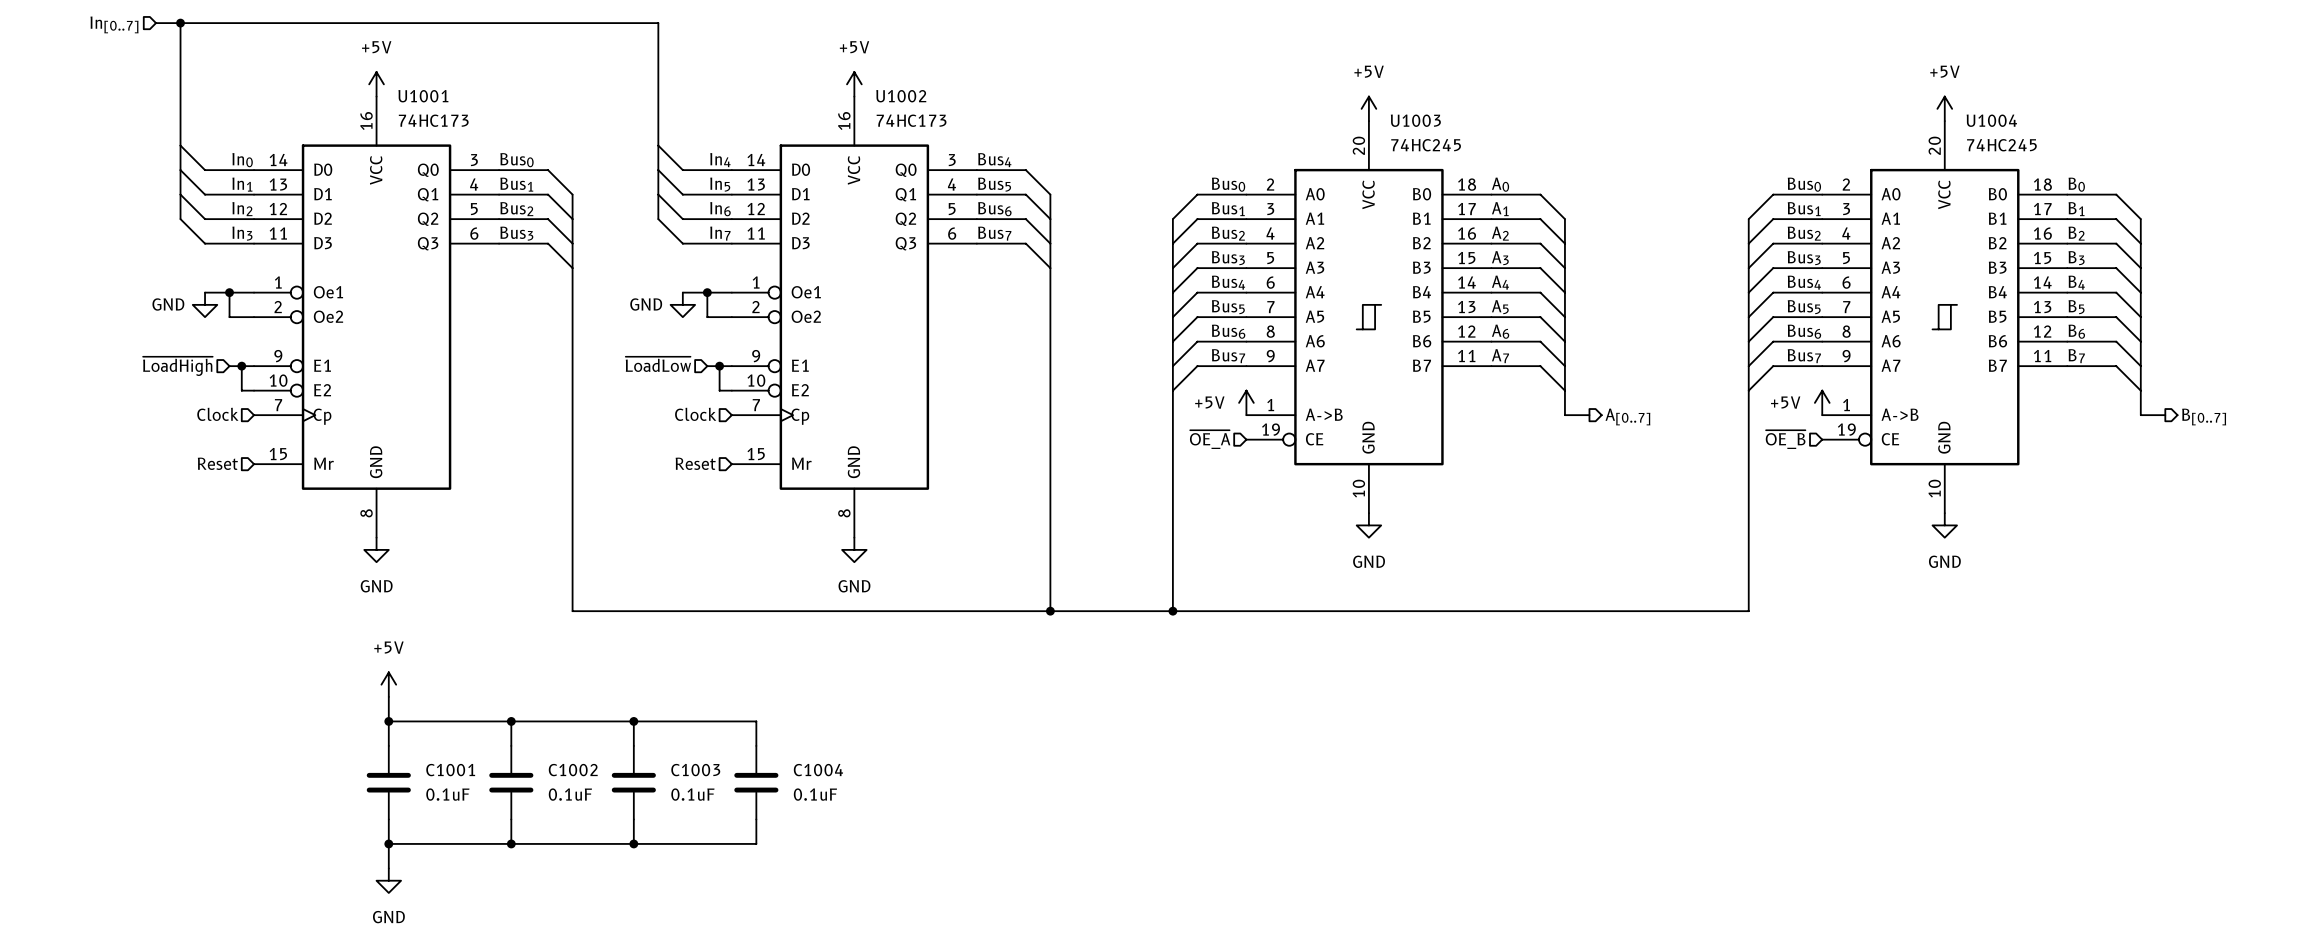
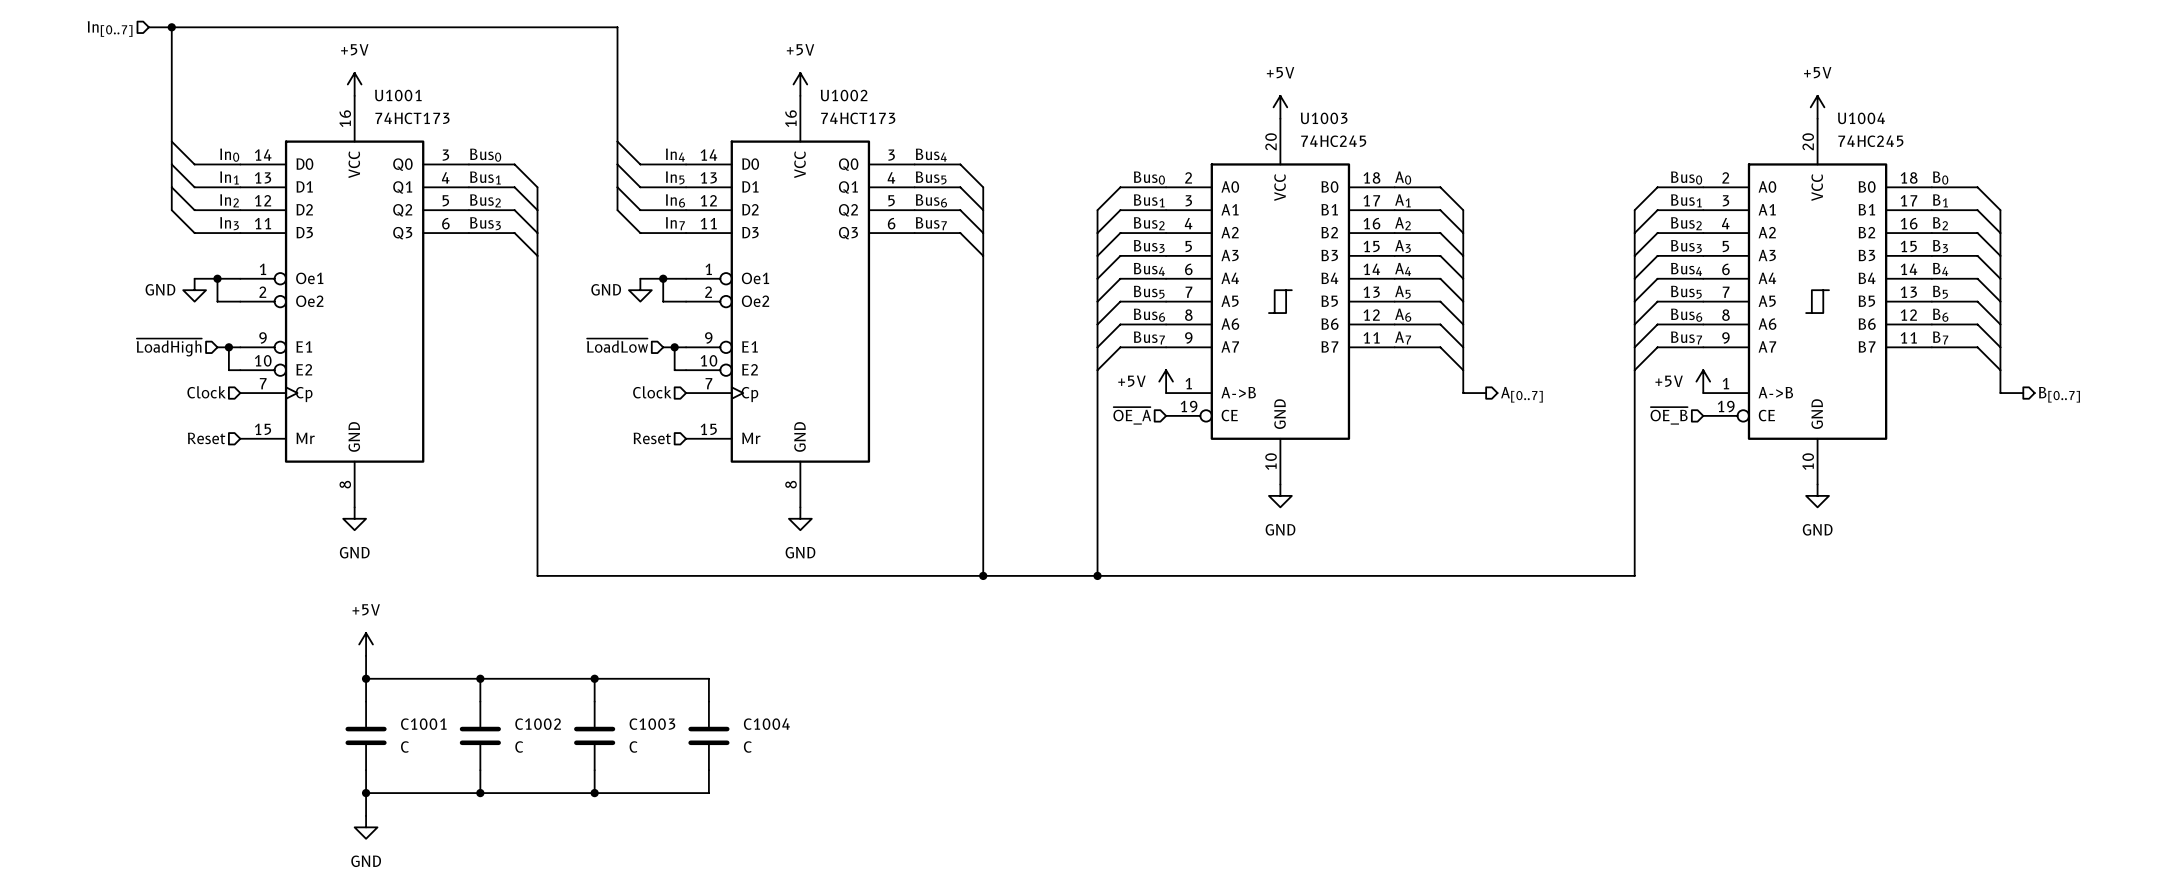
U1001 value: 74HC173 (433, 120) -> 74HCT173 (412, 118)
U1002 value: 74HC173 (911, 120) -> 74HCT173 (858, 118)
C1001 value: 0.1uF (447, 794) -> C (404, 747)
C1002 value: 0.1uF (570, 794) -> C (519, 747)
C1003 value: 0.1uF (692, 794) -> C (633, 747)
C1004 value: 0.1uF (815, 794) -> C (747, 747)

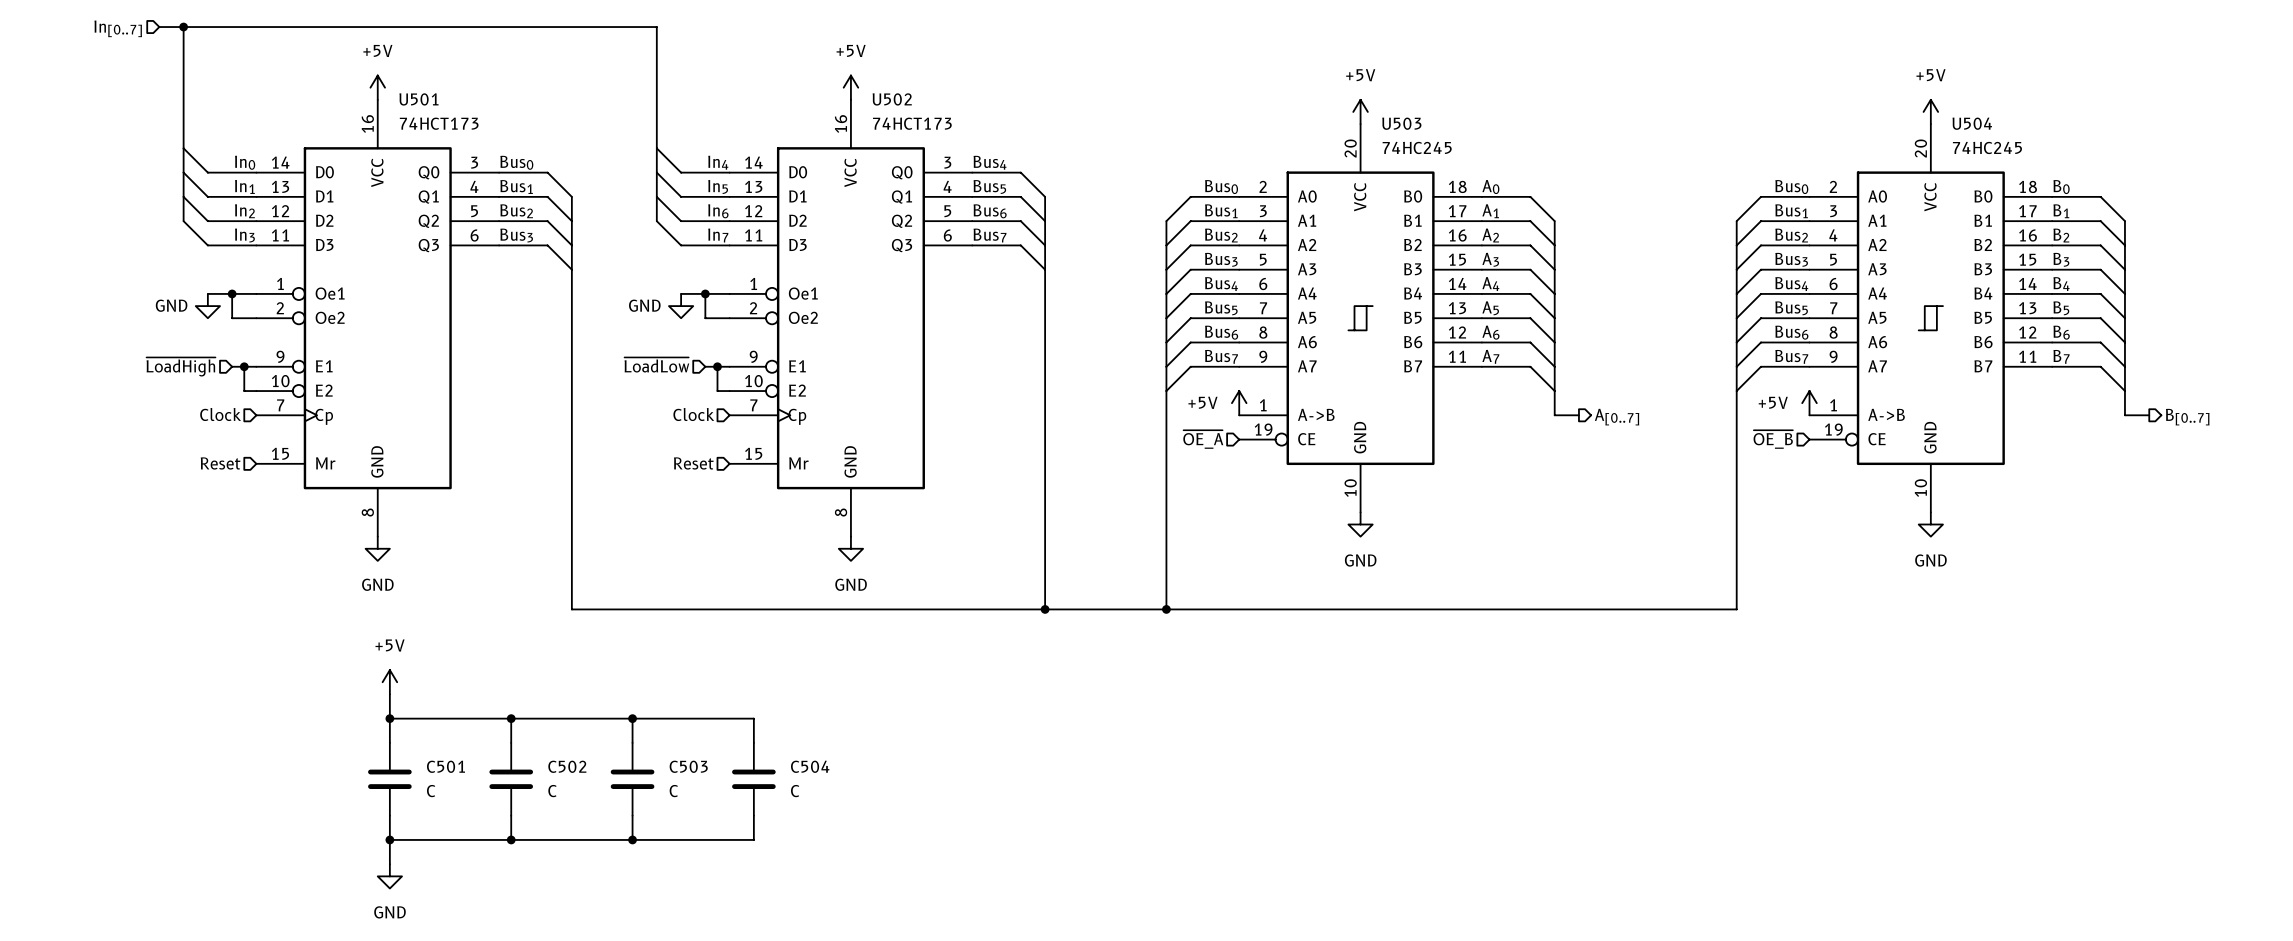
U1001 name: U1001 (398, 95) -> U501 (418, 99)
U1002 name: U1002 (844, 95) -> U502 (892, 99)
U1003 name: U1003 (1324, 118) -> U503 (1401, 123)
U1004 name: U1004 (1861, 118) -> U504 (1972, 123)
C1001 name: C1001 (423, 724) -> C501 (445, 766)
C1002 name: C1002 (538, 724) -> C502 (567, 766)
C1003 name: C1003 (652, 724) -> C503 (688, 766)
C1004 name: C1004 (766, 724) -> C504 (810, 766)

